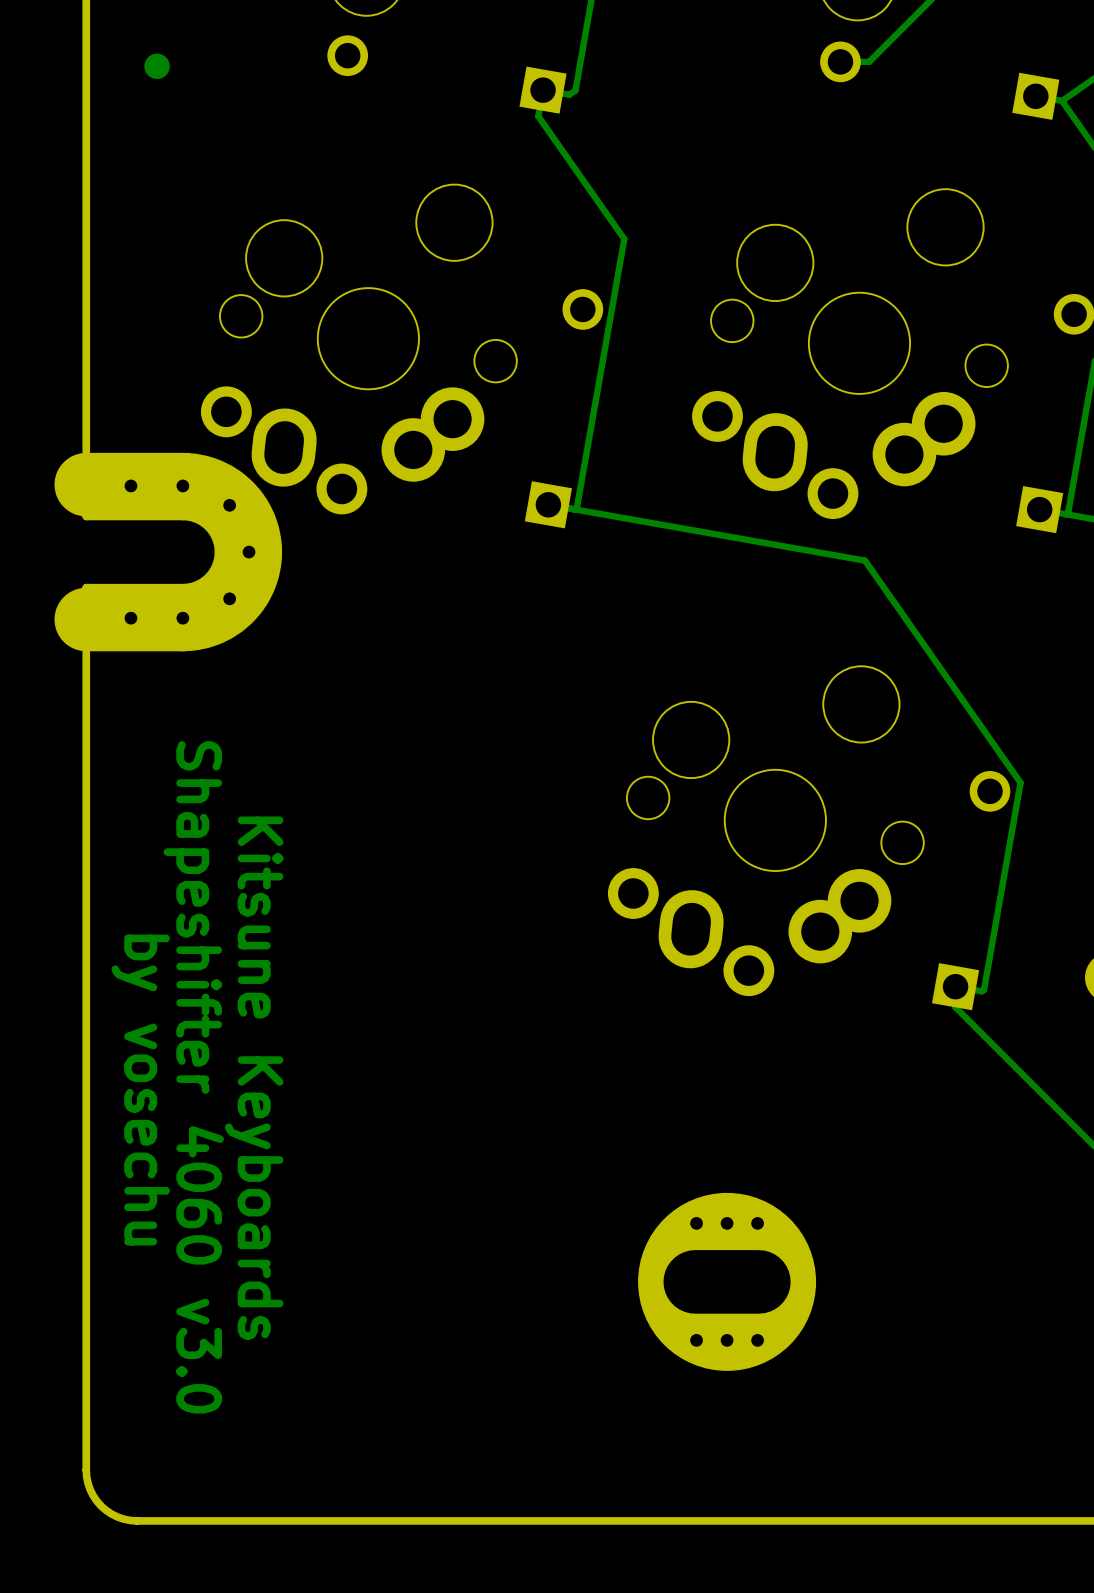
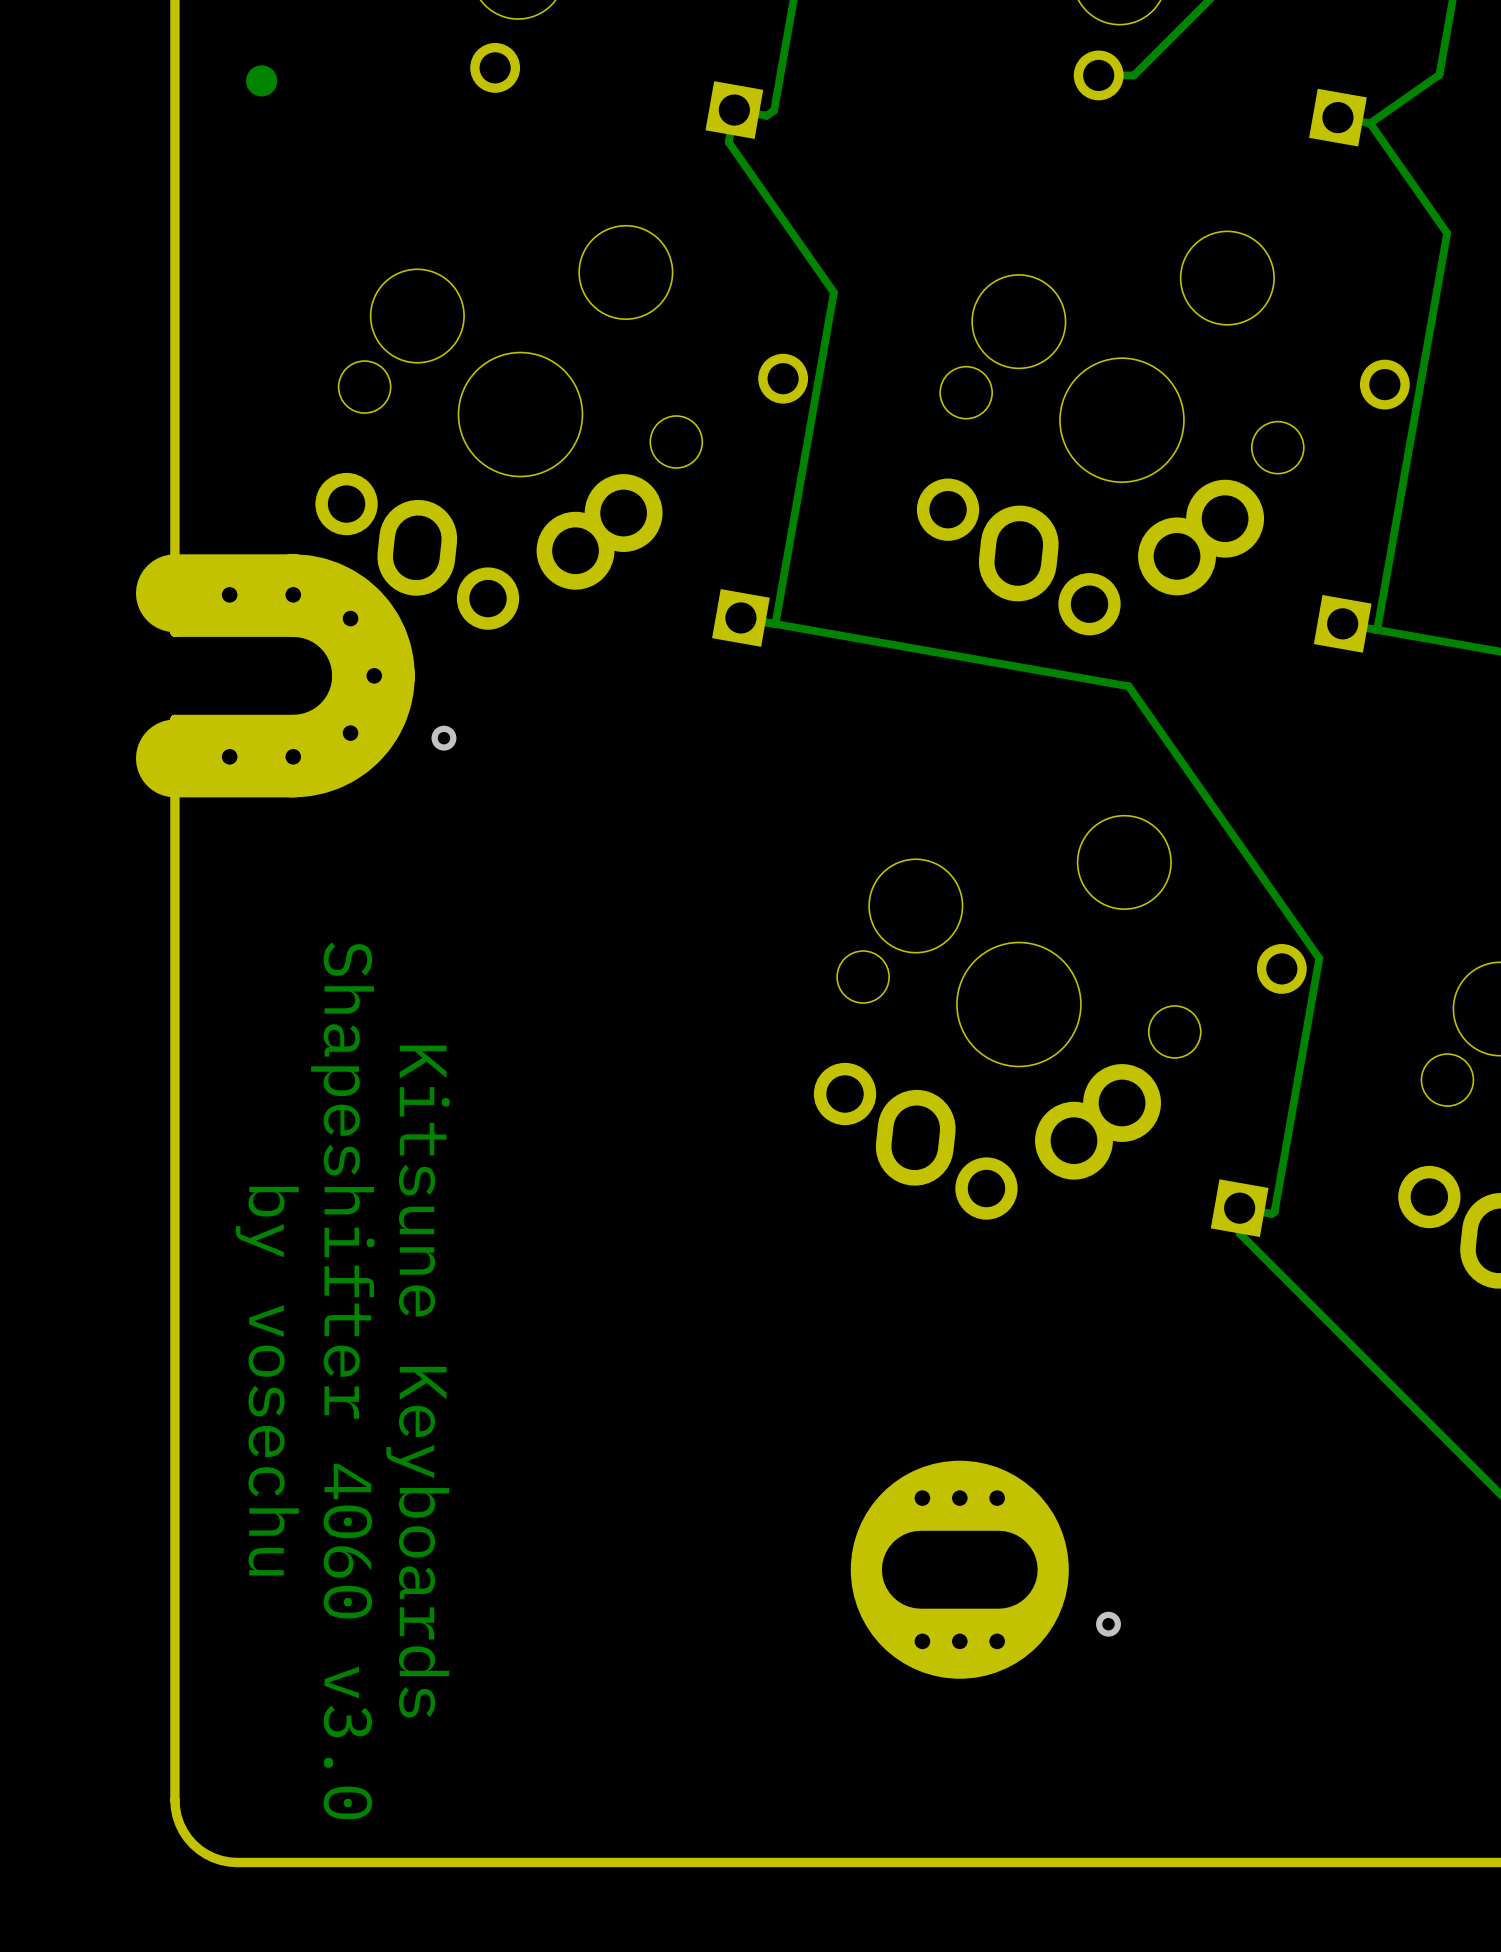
via: none -> (443, 738)
text position: Shapeshifter 4060 v3.0 (193, 1077) -> Shapeshifter 4060 v3.0 (342, 1380)
text position: Kitsune Keyboards (254, 1078) -> Kitsune Keyboards (418, 1381)
text position: by vosechu (140, 1090) -> by vosechu (267, 1381)
via: none -> (1108, 1624)

